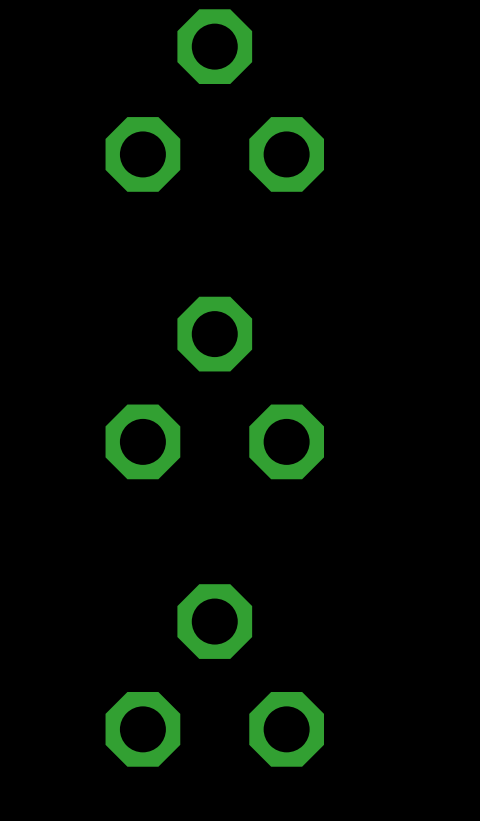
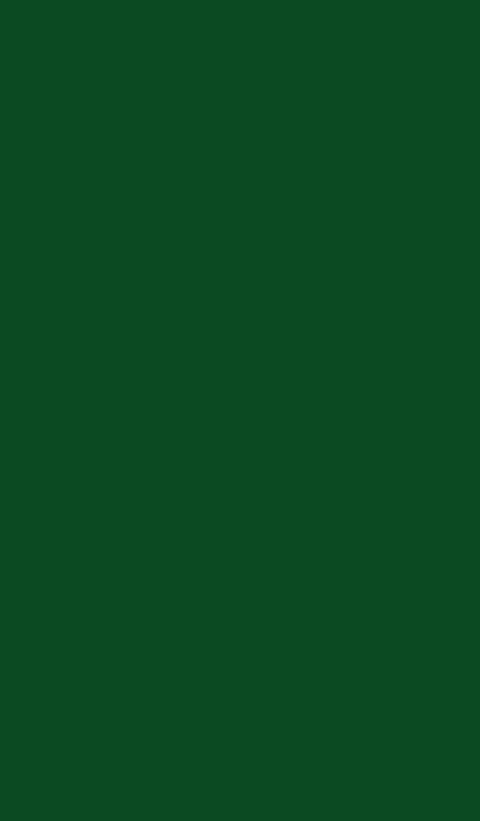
part: (214, 100) -> none
part: (214, 387) -> none
part: (214, 675) -> none

